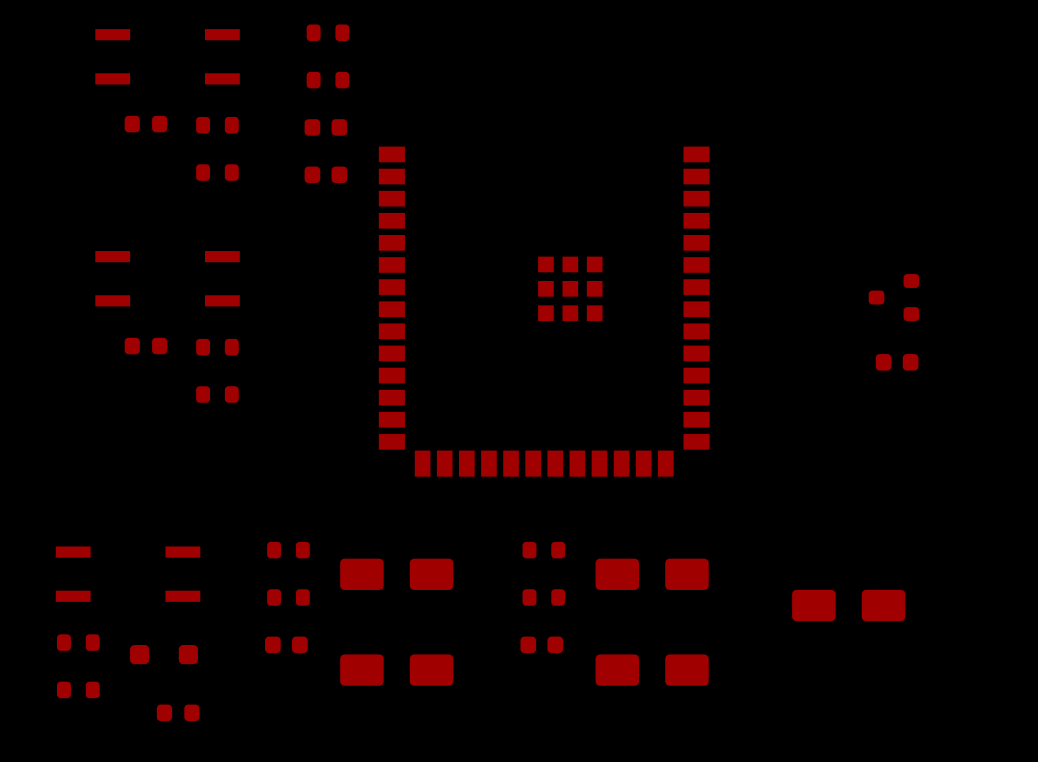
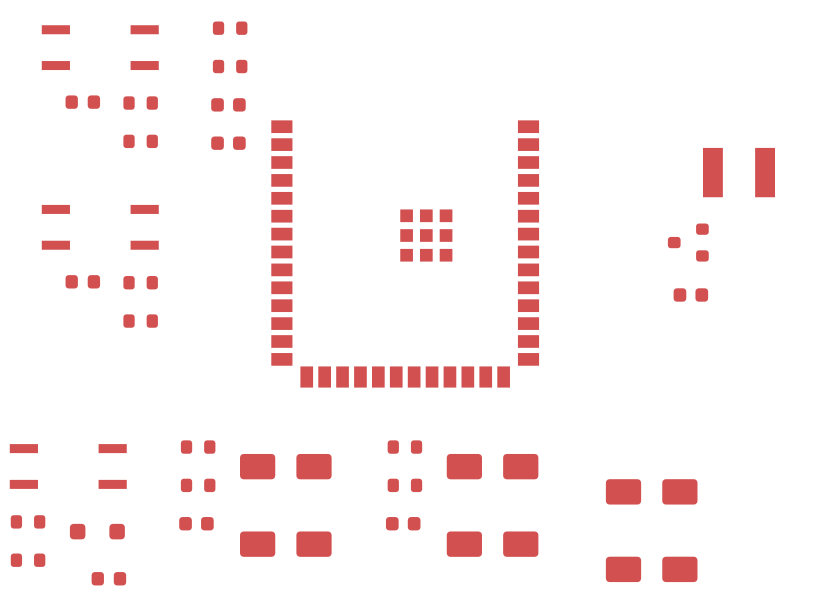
part: none -> (738, 172)
part: none -> (651, 569)

